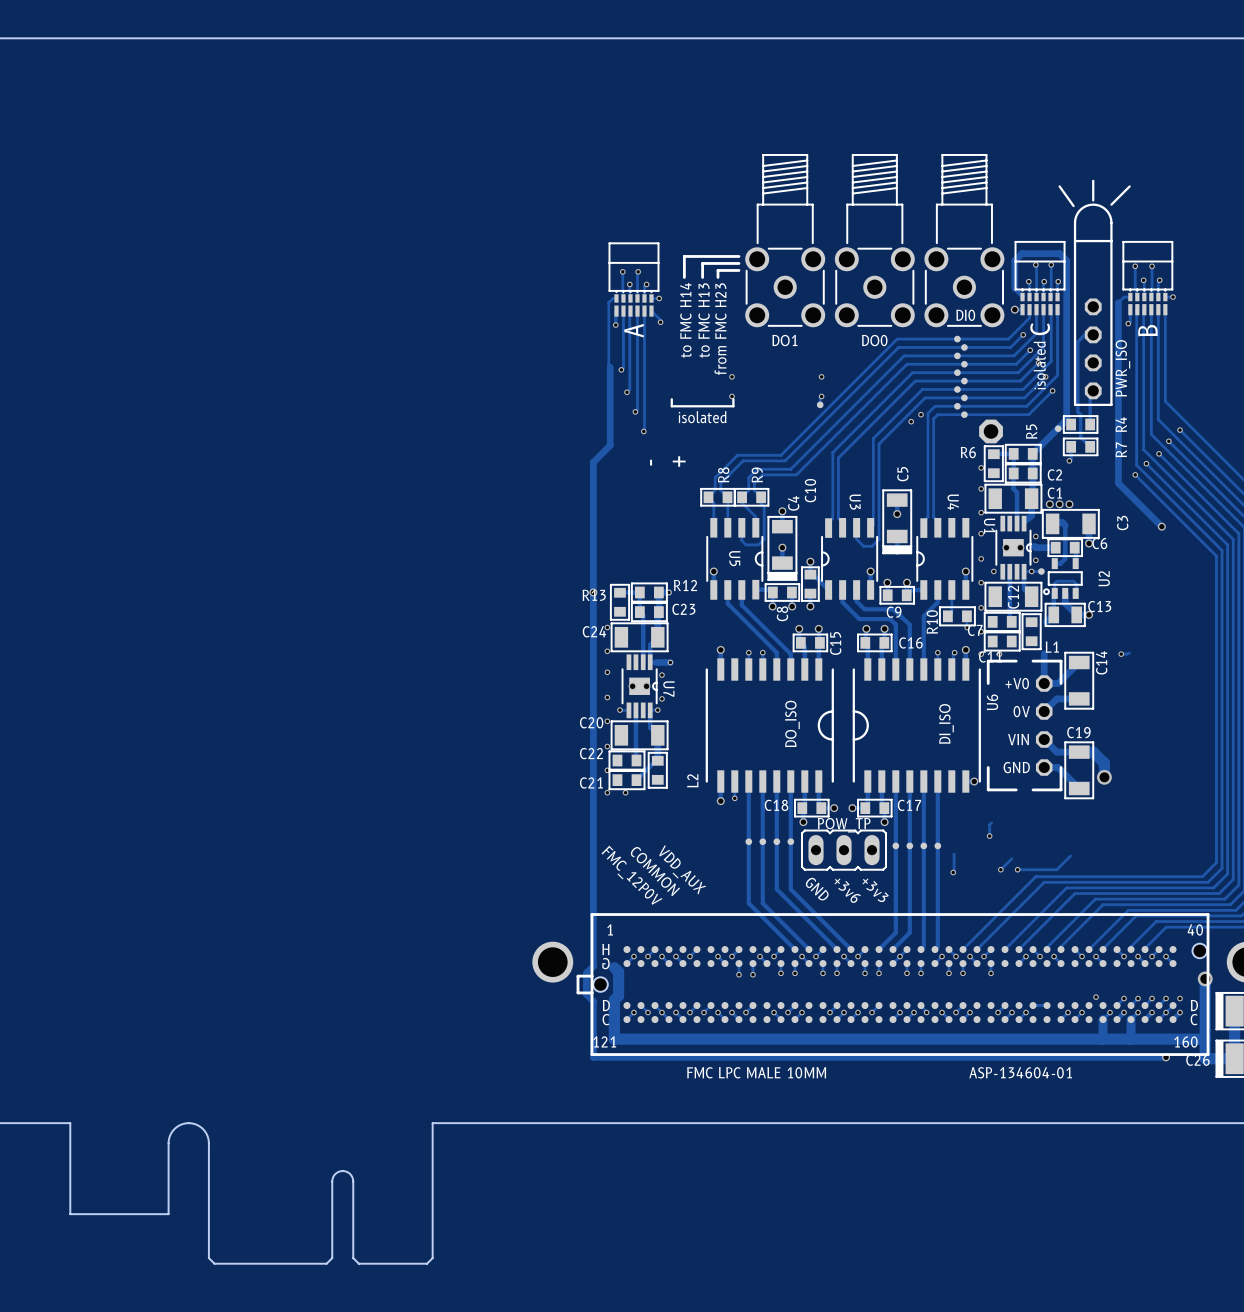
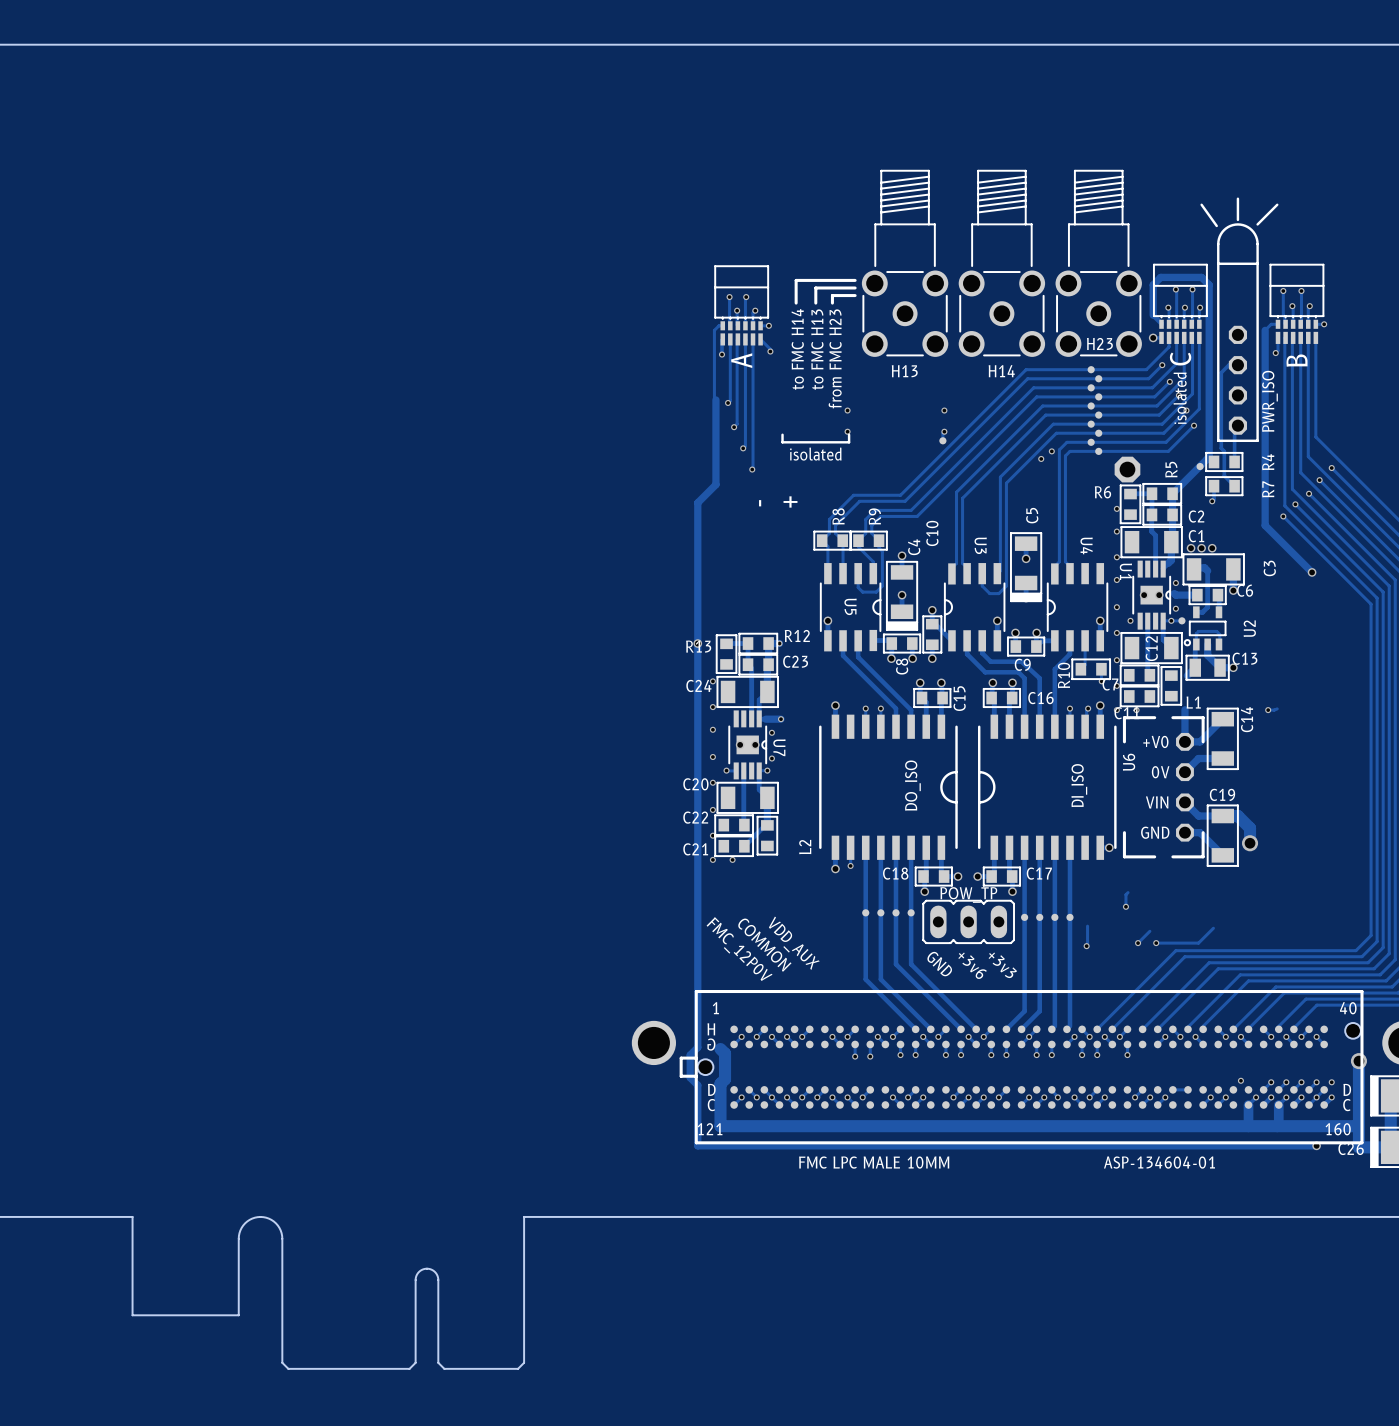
DI0 name: DI0 (965, 315) -> H23 (1099, 343)
DO1 name: DO1 (784, 340) -> H13 (904, 371)
DO0 name: DO0 (874, 340) -> H14 (1001, 371)

